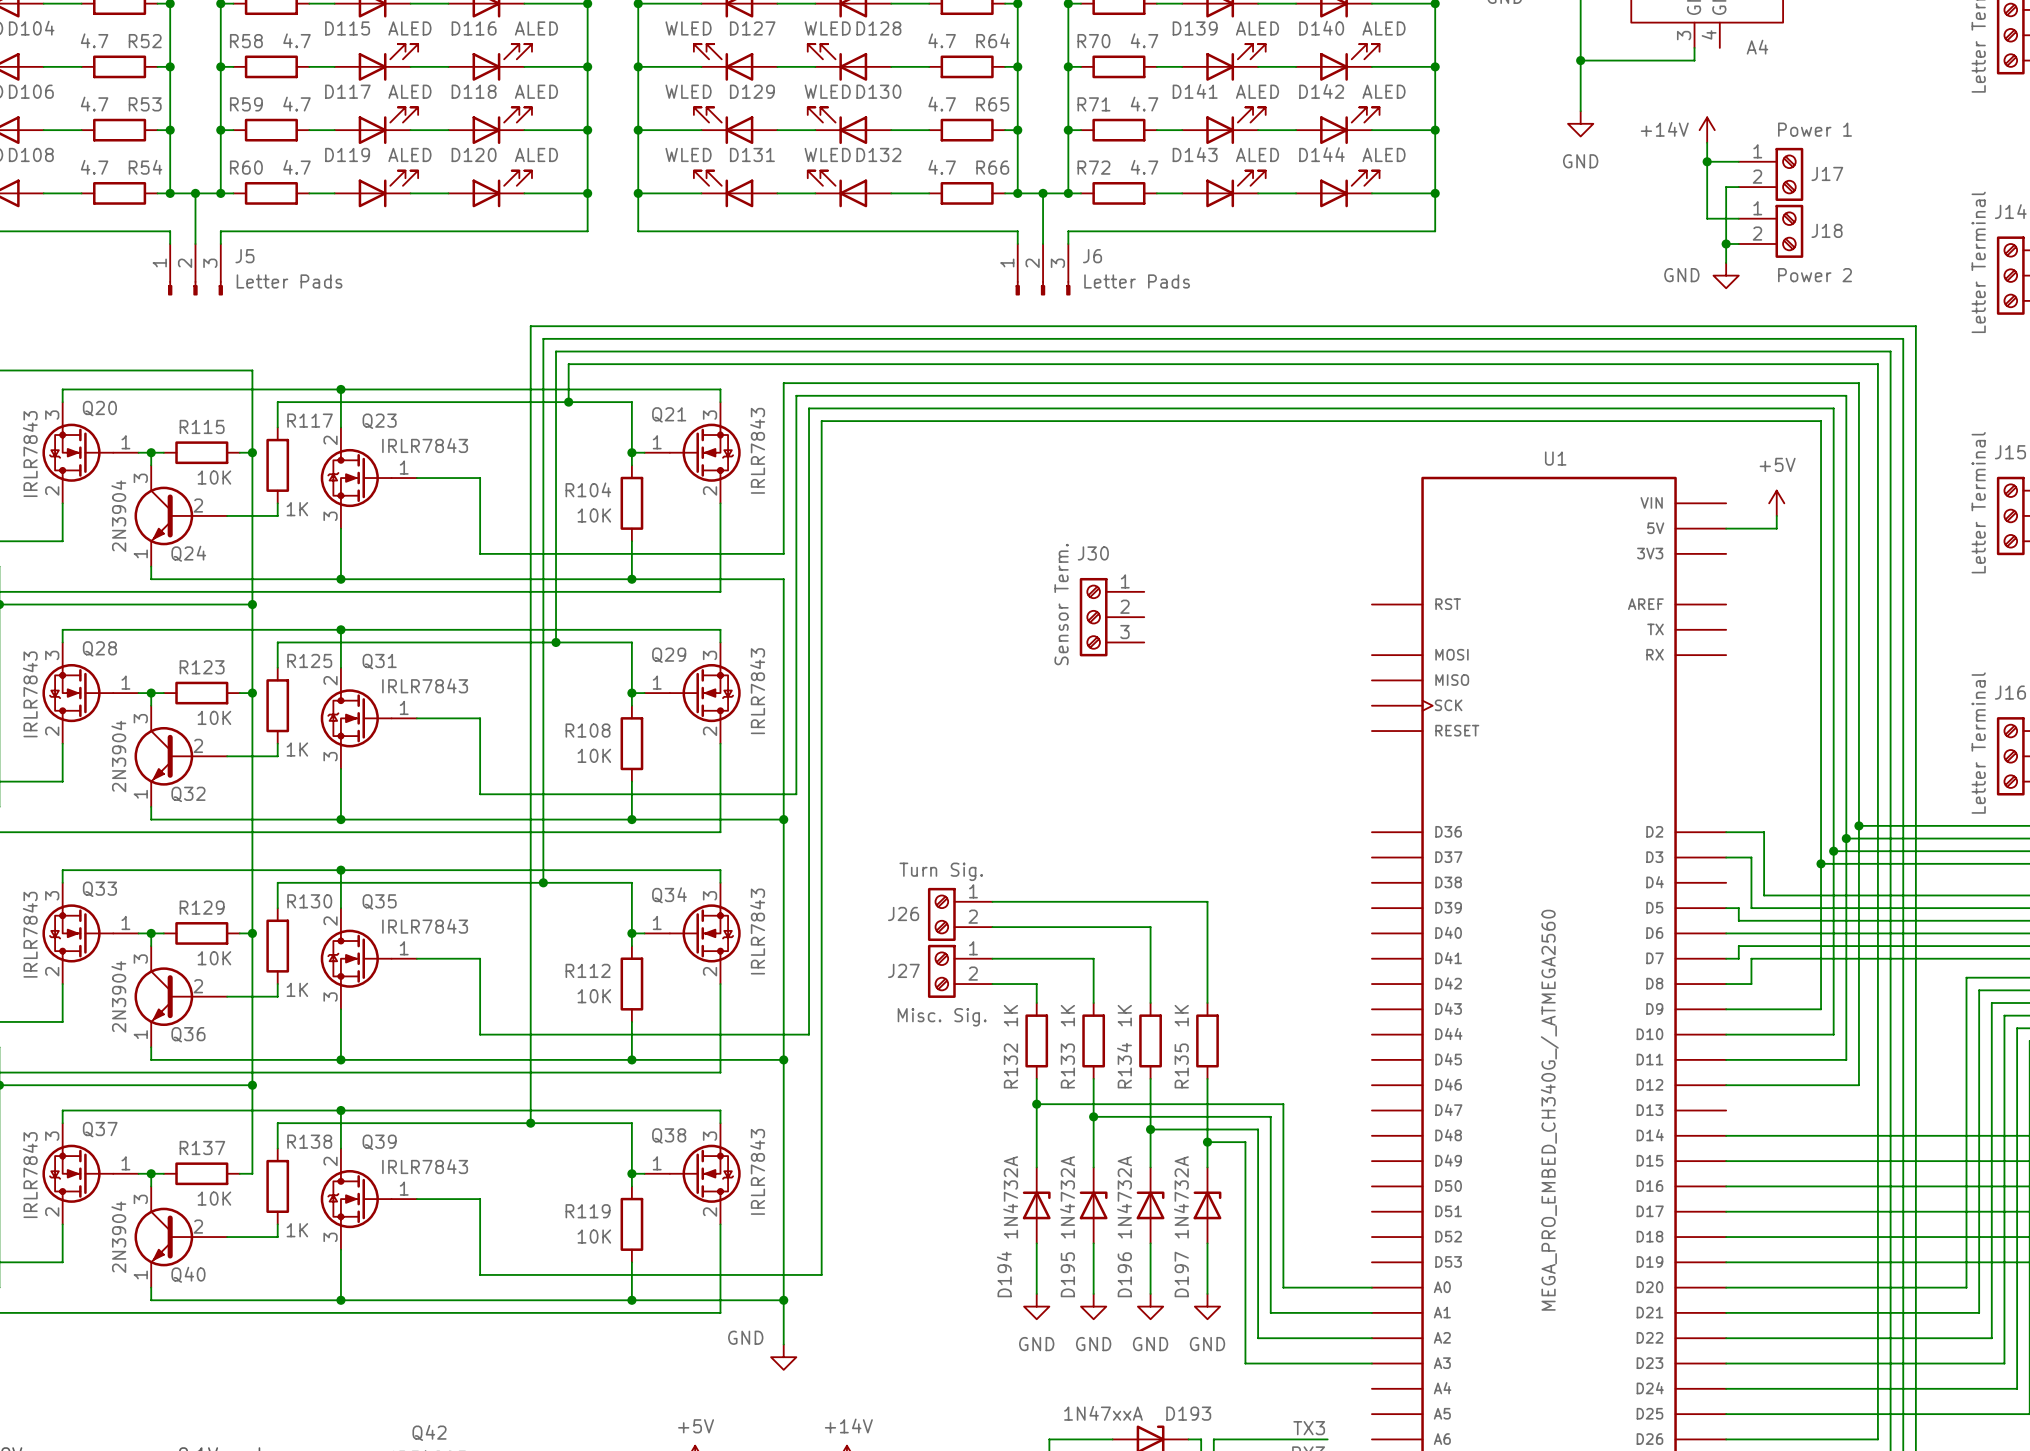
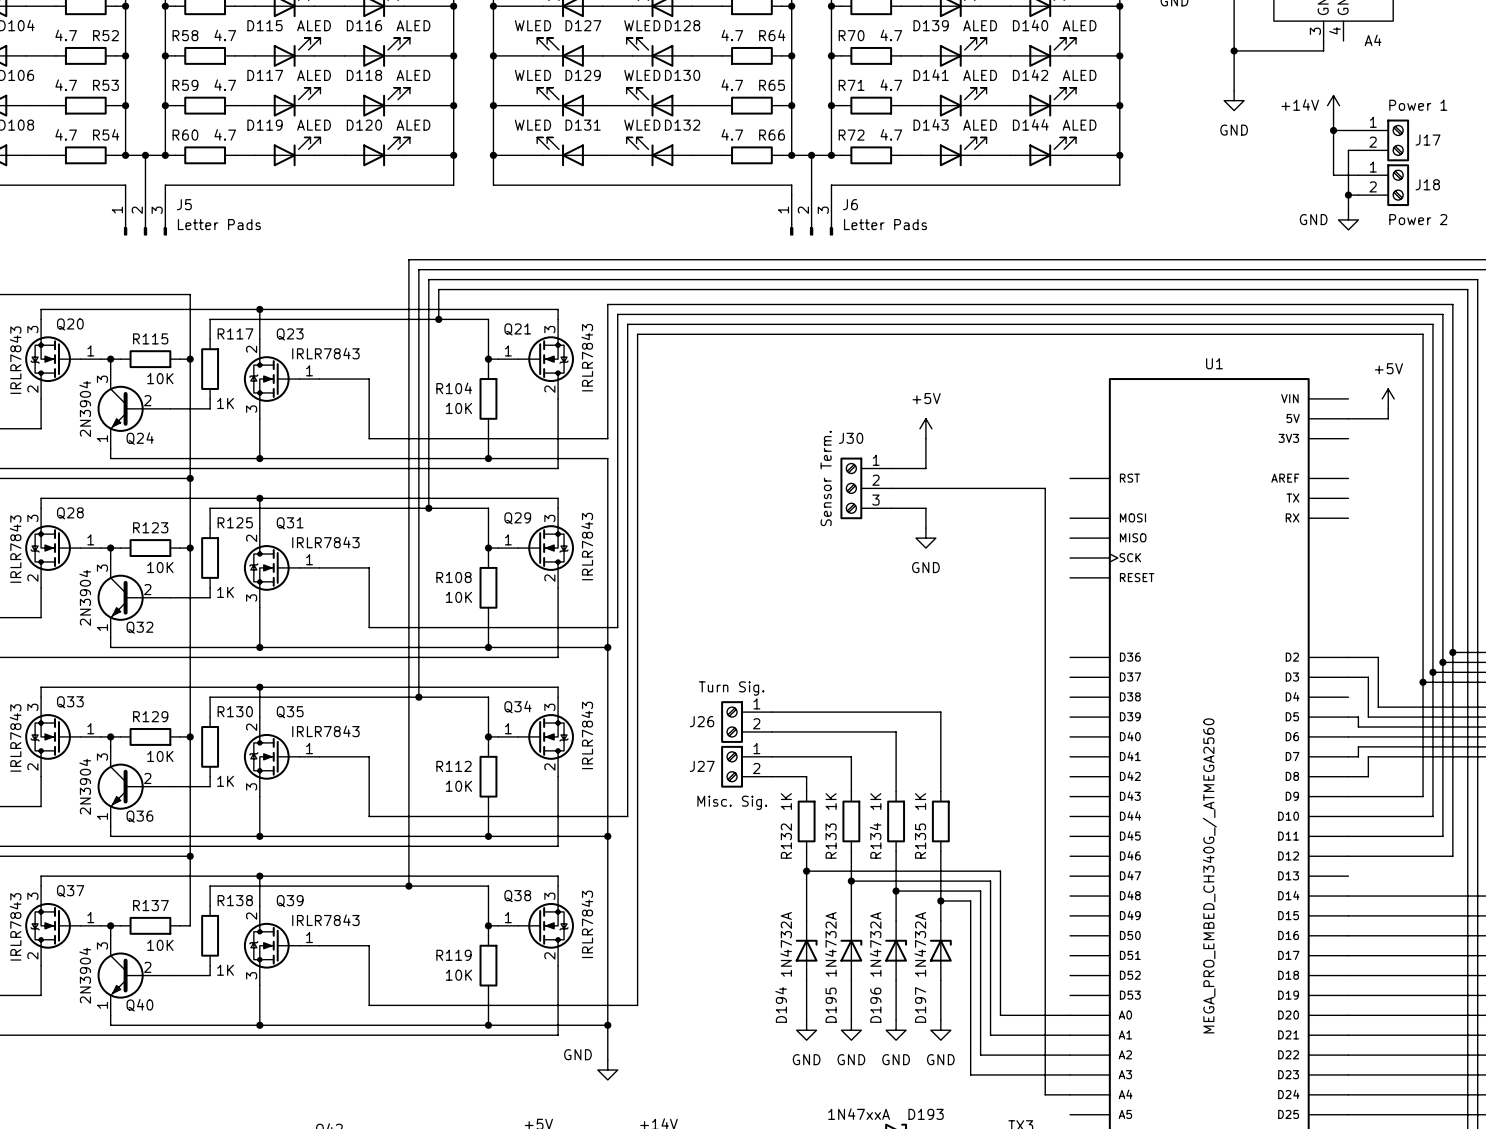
power symbol: none -> +5V (925, 428)
wire: none -> (925, 438) (925, 468) (891, 468)
wire: none -> (891, 488) (1045, 488) (1045, 1094) (1070, 1094)
wire: none -> (891, 508) (925, 508) (925, 528)
power symbol: none -> GND (925, 538)

